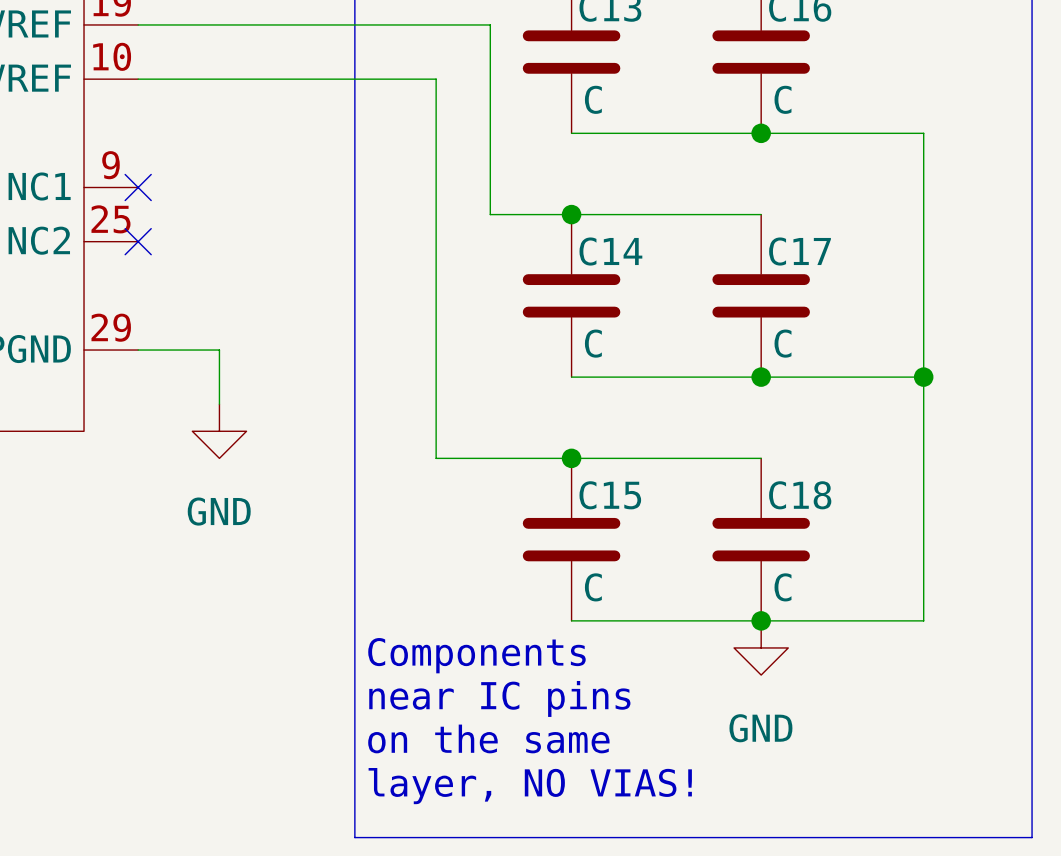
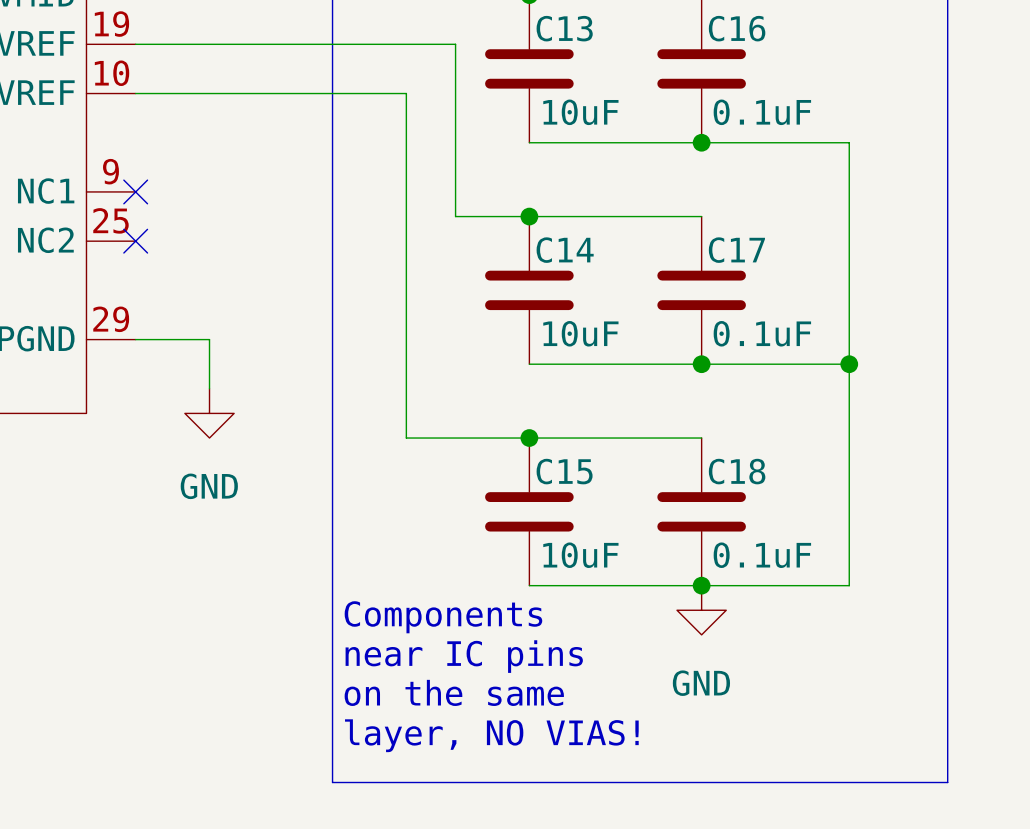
C13 value: C (593, 99) -> 10uF (580, 112)
C16 value: C (783, 99) -> 0.1uF (762, 112)
C14 value: C (593, 343) -> 10uF (580, 333)
C17 value: C (783, 343) -> 0.1uF (762, 333)
C15 value: C (593, 587) -> 10uF (580, 555)
C18 value: C (783, 587) -> 0.1uF (762, 555)

